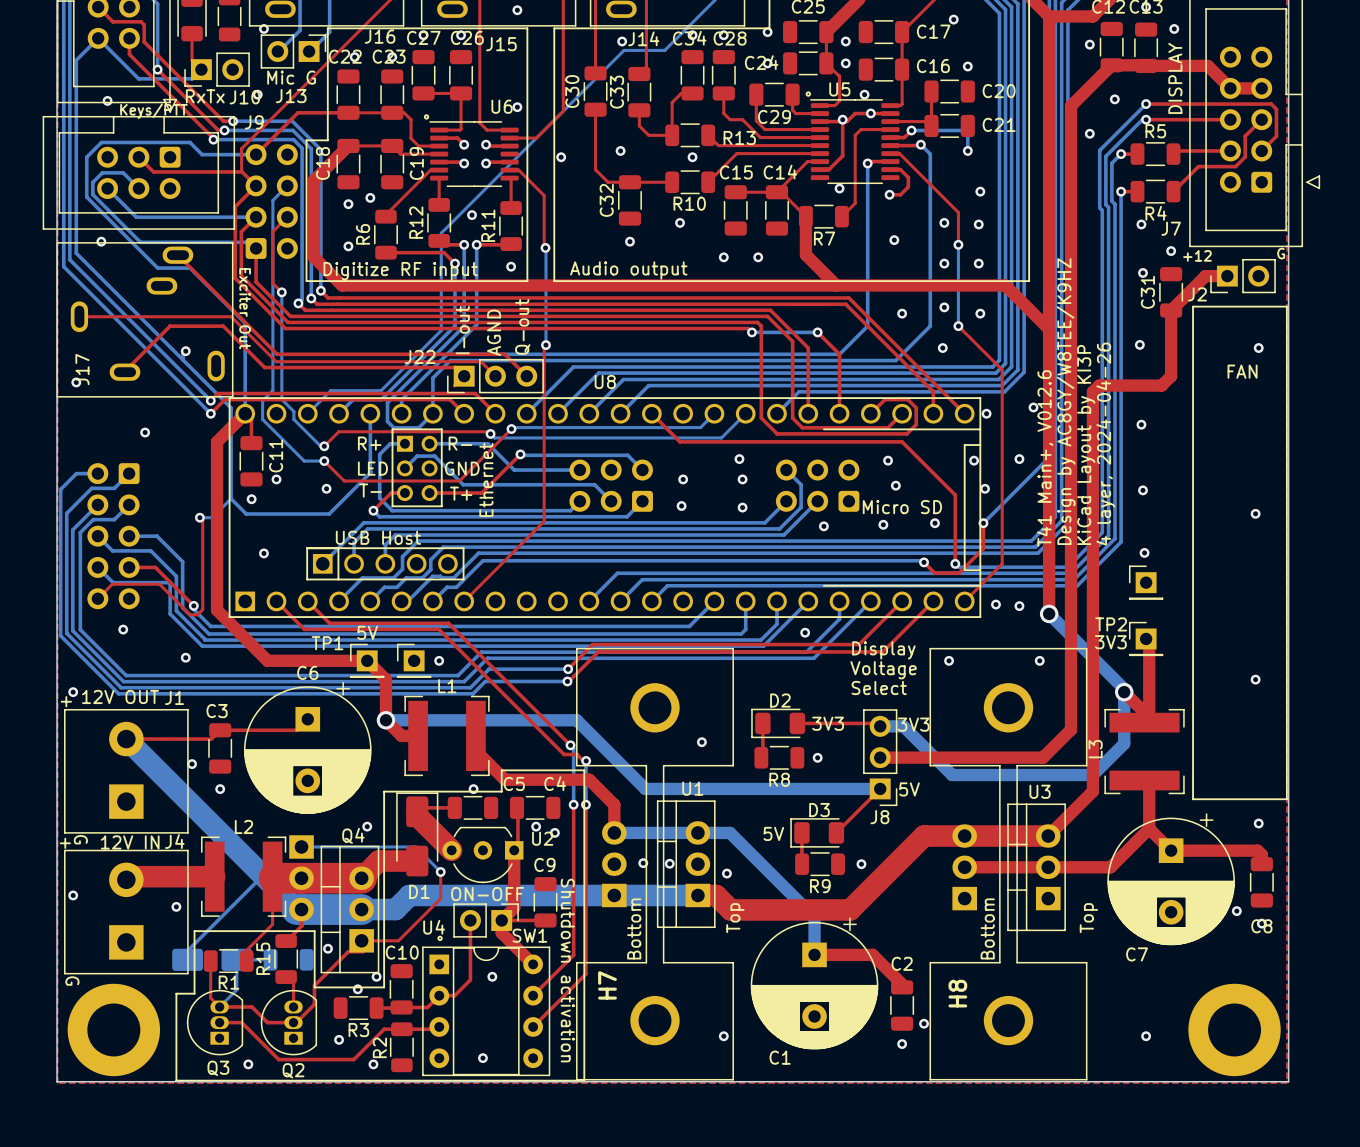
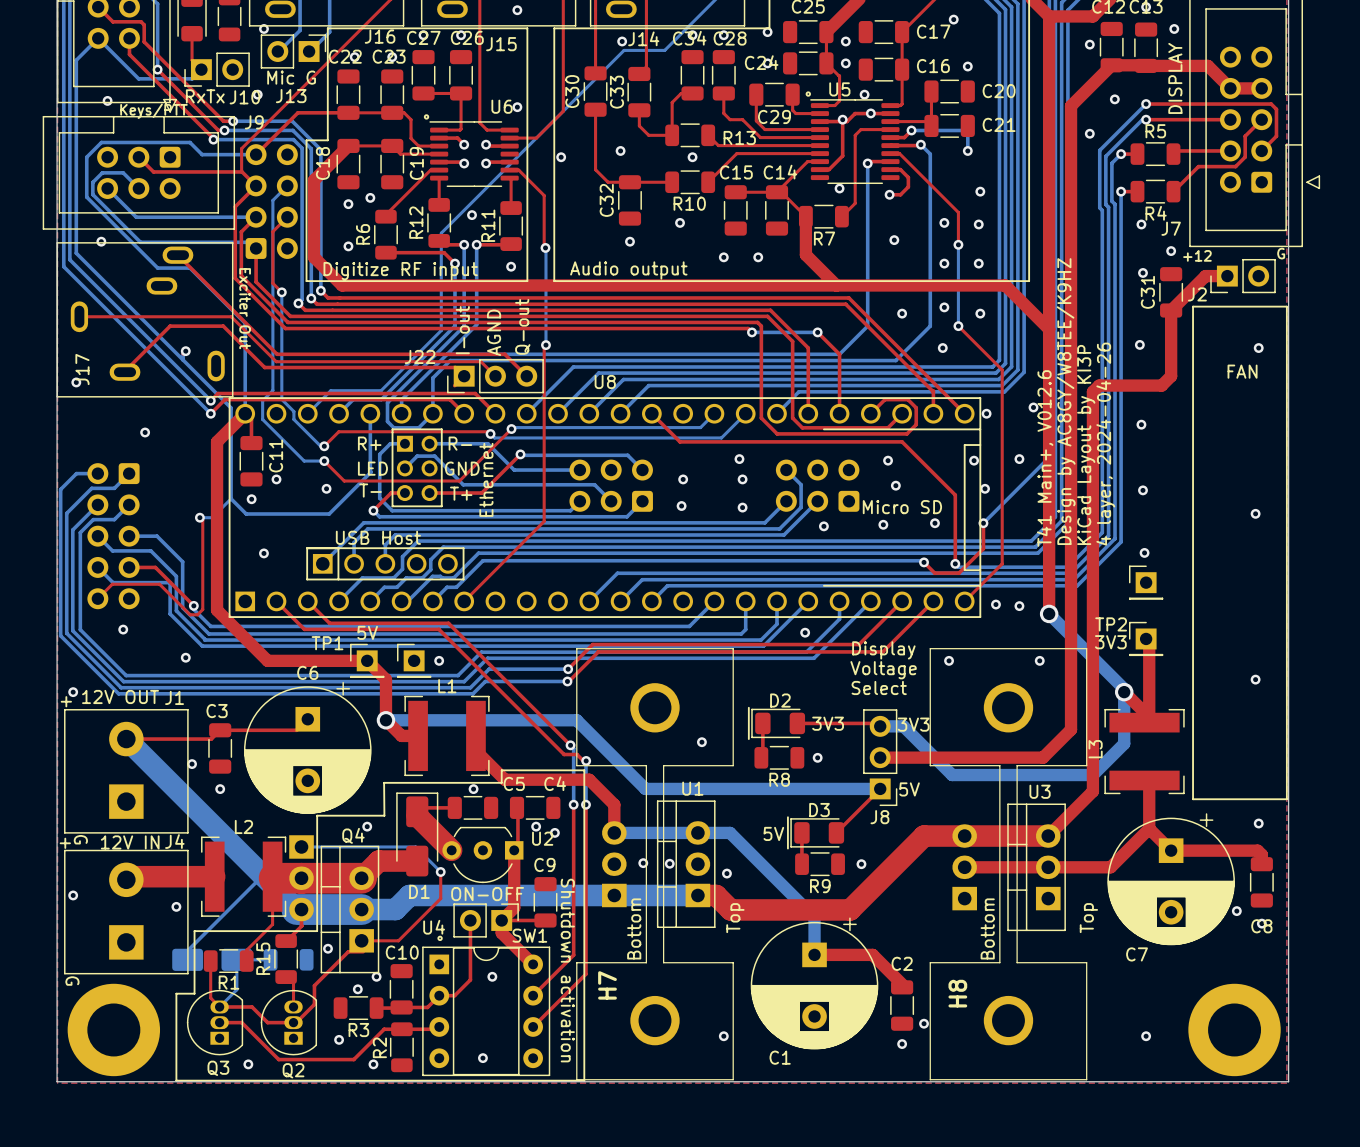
line: none -> (748, 707) (748, 739)
line: (501, 782) (501, 791) (384, 791) (384, 987) (314, 987) (314, 931) -> (501, 782) (384, 782) (384, 815) (317, 815) (317, 931) (314, 931)
line: none -> (787, 817) (787, 848)

